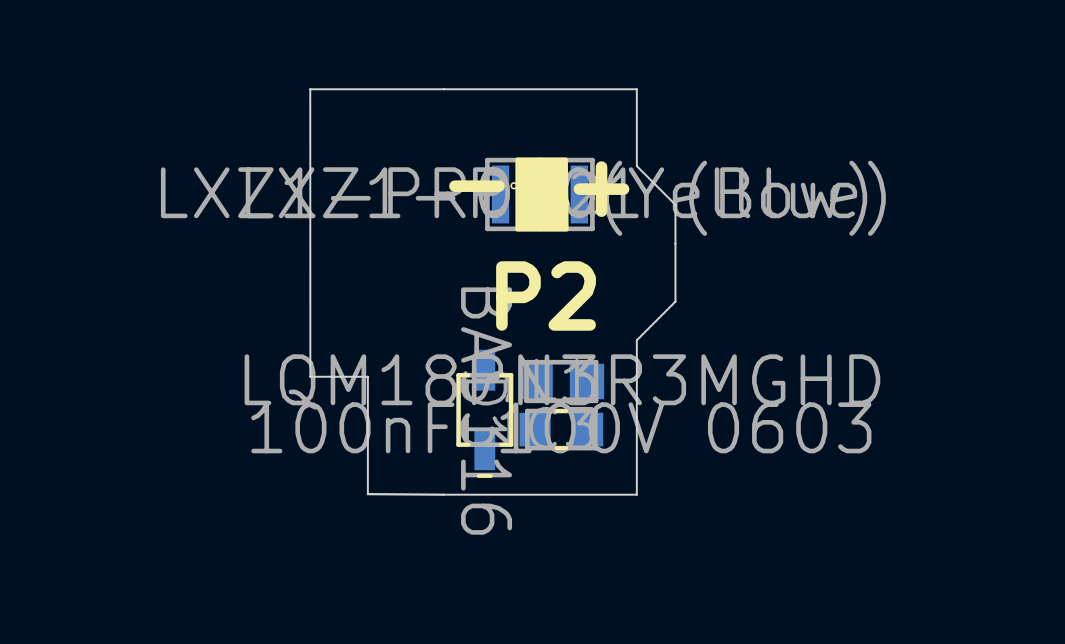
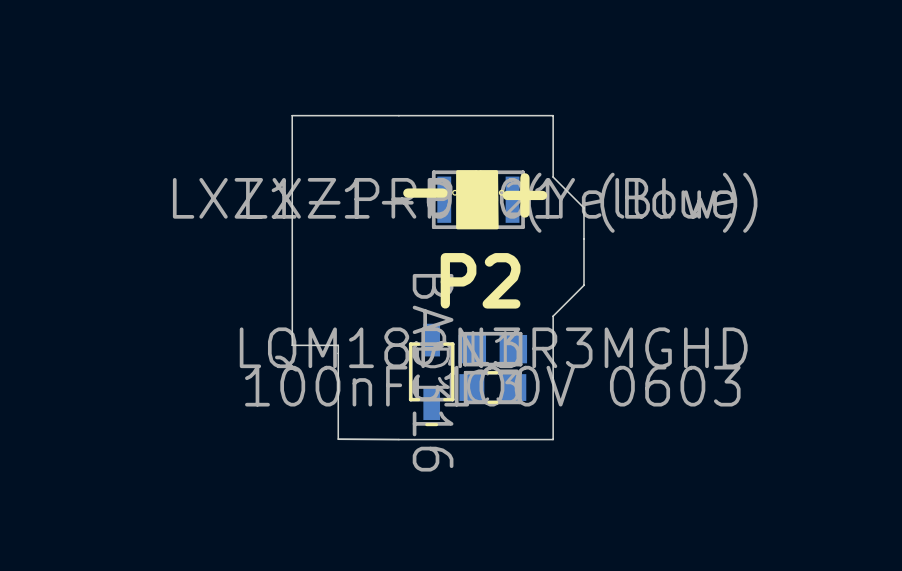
part rotation: 0° (565, 194) -> 180° (501, 199)

